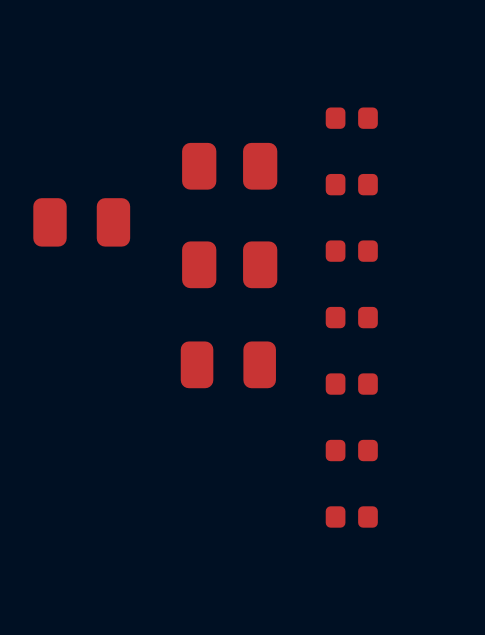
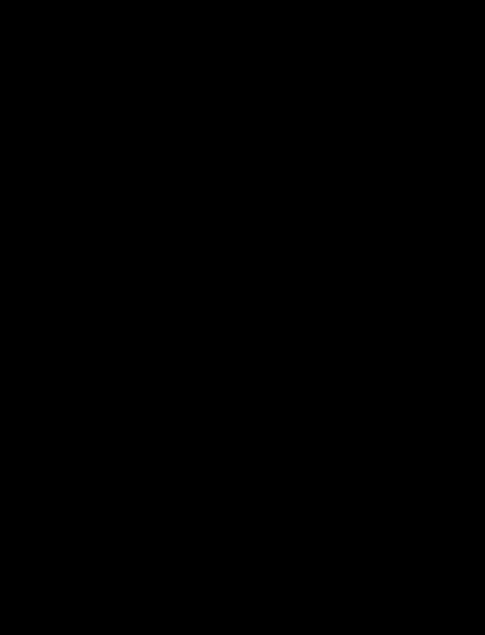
part: (351, 118) -> none
part: (229, 166) -> none
part: (351, 184) -> none
part: (81, 222) -> none
part: (351, 251) -> none
part: (229, 264) -> none
part: (351, 317) -> none
part: (228, 364) -> none
part: (351, 384) -> none
part: (351, 450) -> none
part: (351, 516) -> none

